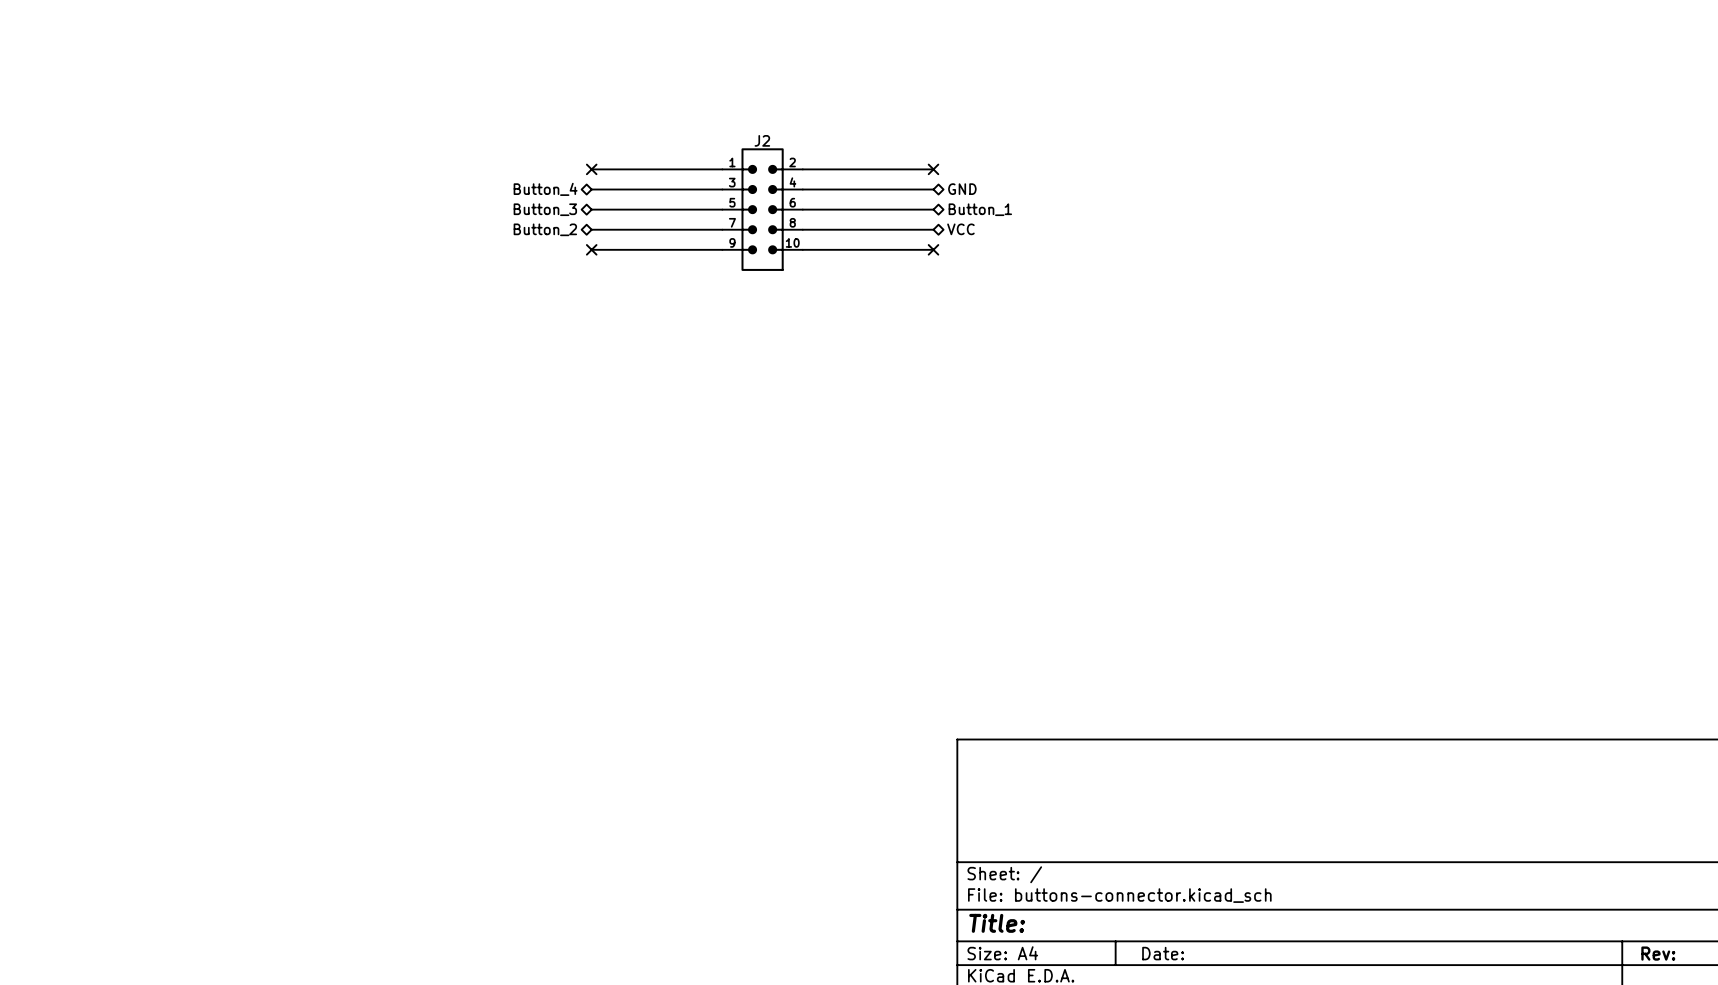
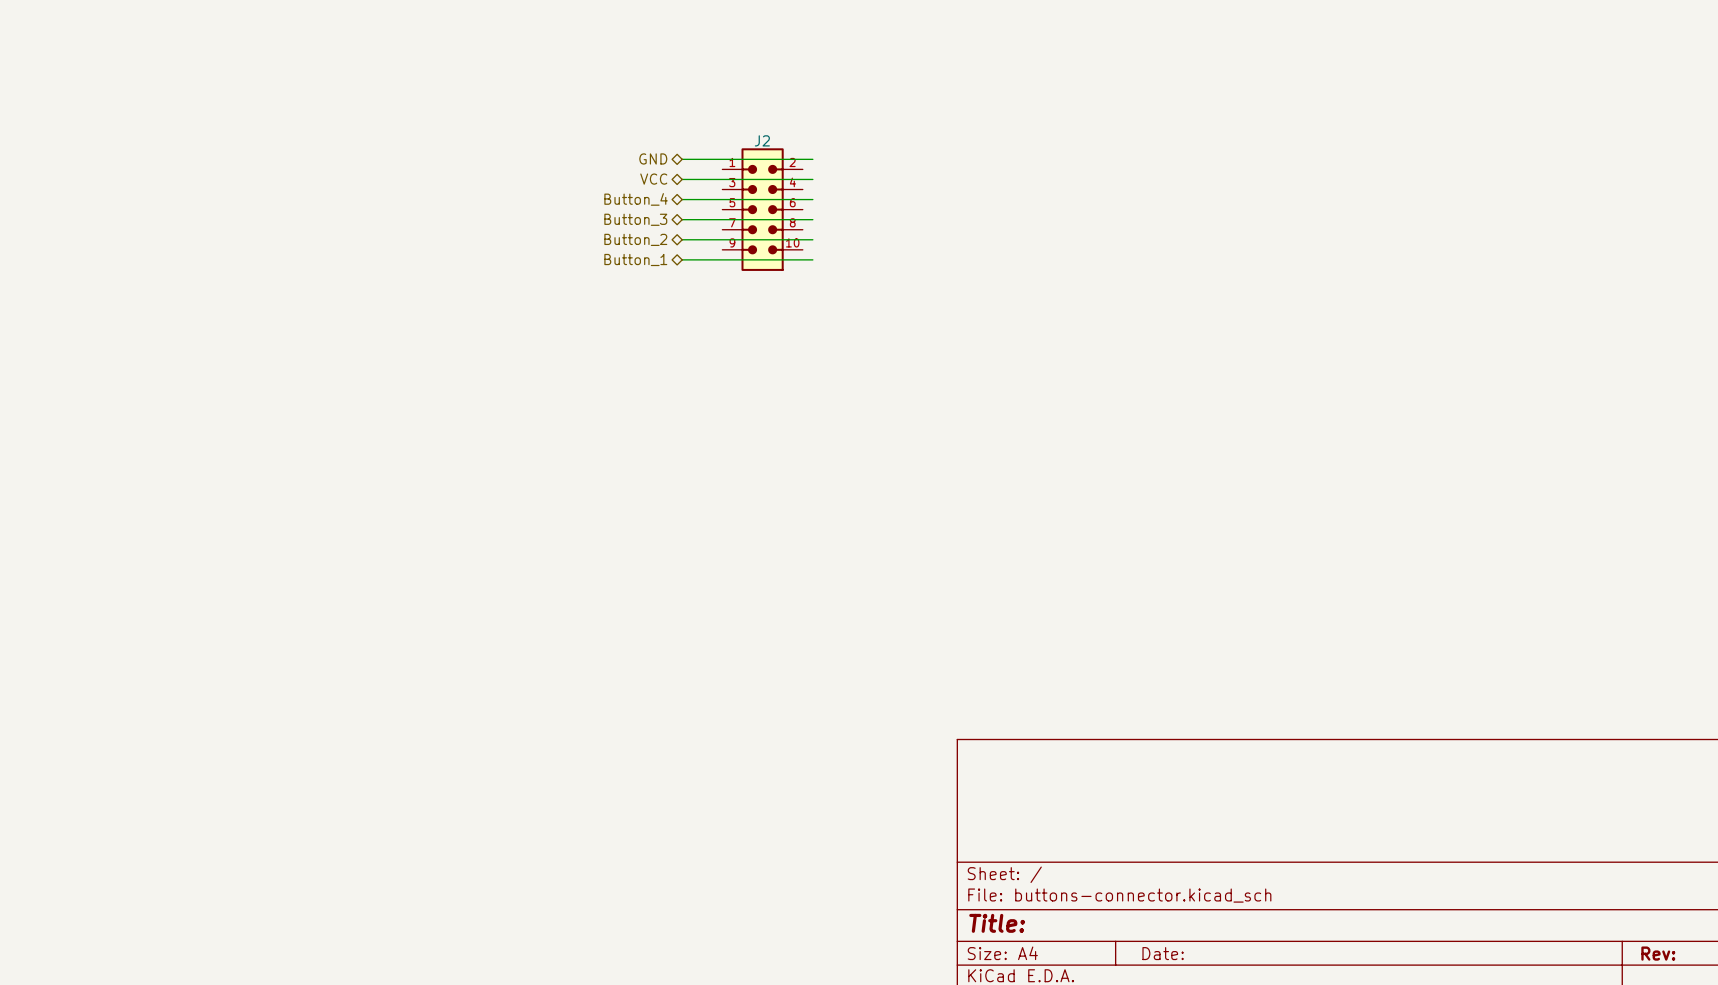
hierarchical label: none -> GND (653, 158)
wire: (591, 169) (722, 169) -> (682, 179) (812, 179)
no-connect mark: (591, 169) -> none
wire: (802, 169) (933, 169) -> (682, 159) (812, 159)
no-connect mark: (933, 169) -> none
hierarchical label: none -> VCC (653, 179)
hierarchical label position: Button_4 (545, 189) -> Button_4 (636, 199)
wire: (591, 189) (722, 189) -> none
wire: (802, 189) (933, 189) -> none
hierarchical label: GND (962, 189) -> none
hierarchical label position: Button_3 (545, 209) -> Button_3 (635, 219)
wire: (591, 209) (722, 209) -> (682, 199) (812, 199)
wire: (802, 209) (933, 209) -> none
hierarchical label: Button_1 (980, 209) -> none
hierarchical label position: Button_2 (545, 229) -> Button_2 (635, 239)
wire: (591, 229) (722, 229) -> (682, 219) (812, 219)
wire: (802, 229) (933, 229) -> none
hierarchical label: VCC (960, 229) -> none
wire: (591, 249) (722, 249) -> (682, 239) (812, 239)
no-connect mark: (591, 249) -> none
wire: (802, 249) (933, 249) -> (682, 259) (812, 259)
no-connect mark: (933, 249) -> none
hierarchical label: none -> Button_1 (635, 259)

